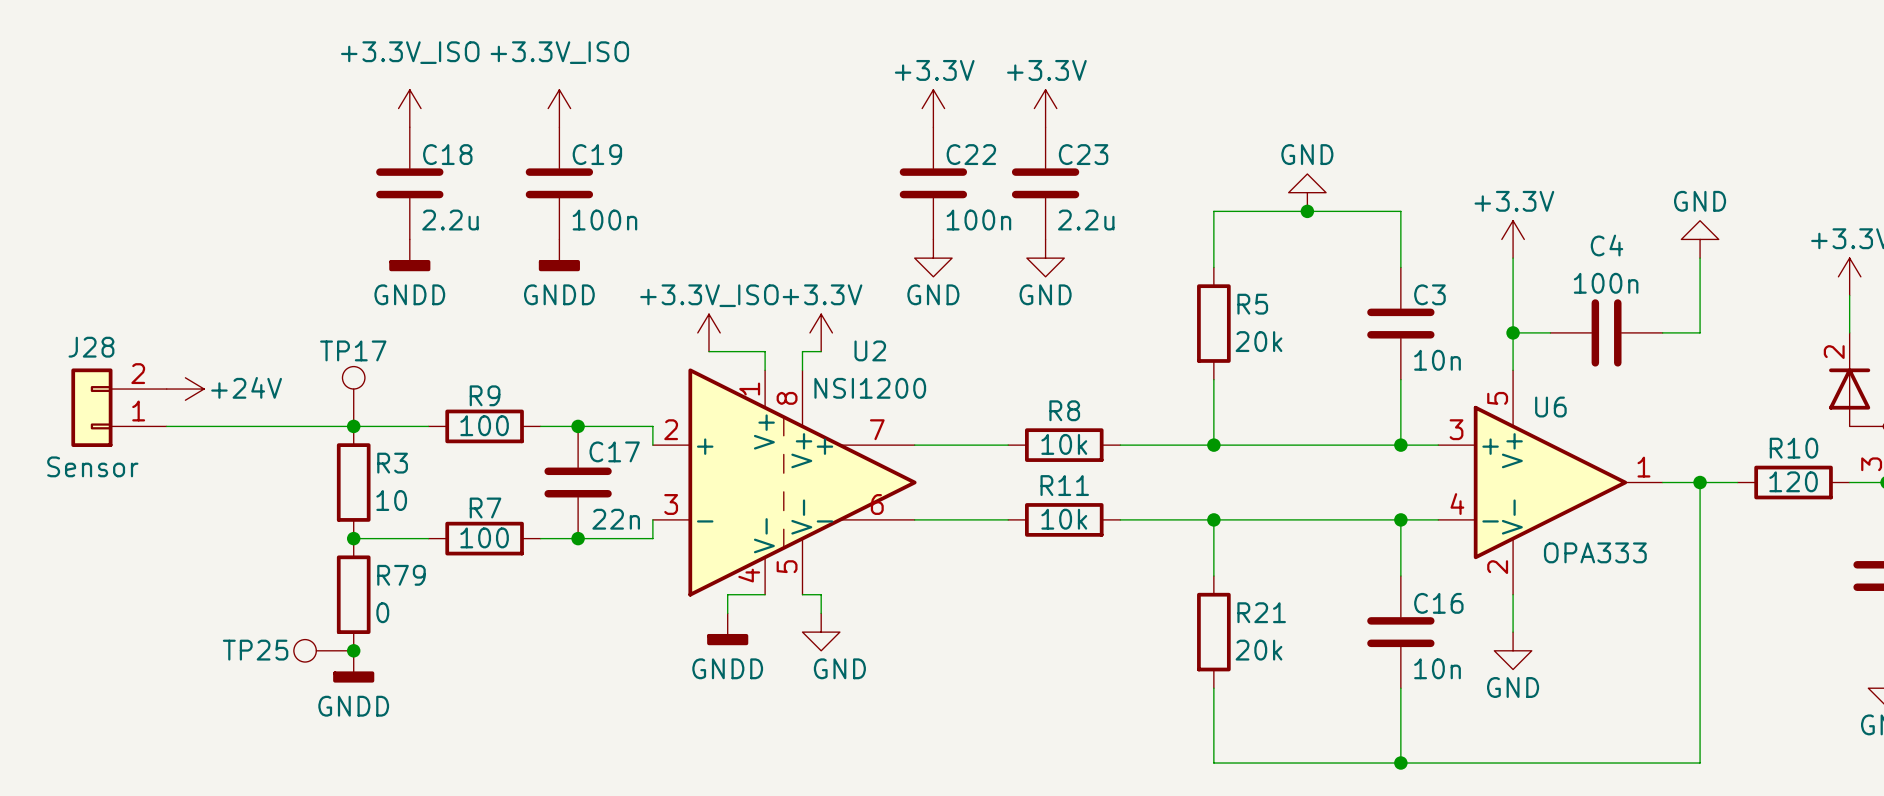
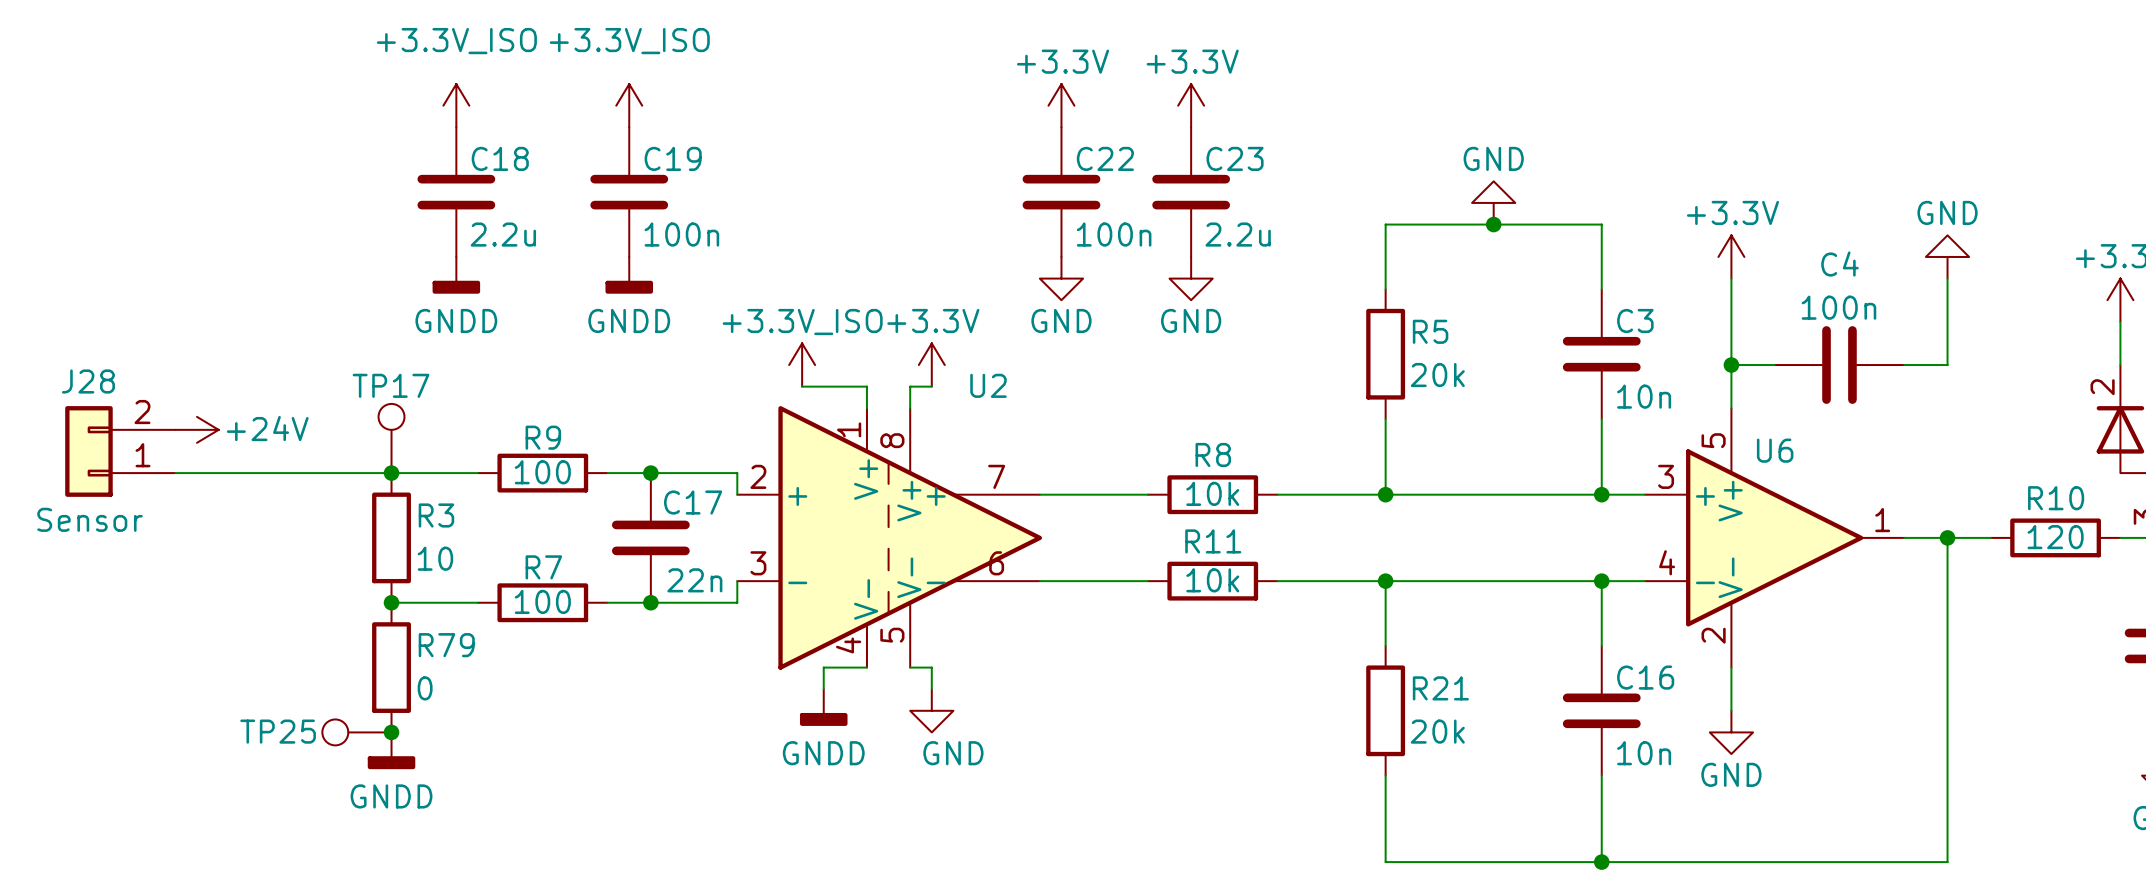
U2 value: NSI1200 (870, 388) -> none
U6 value: OPA333 (1595, 552) -> none

